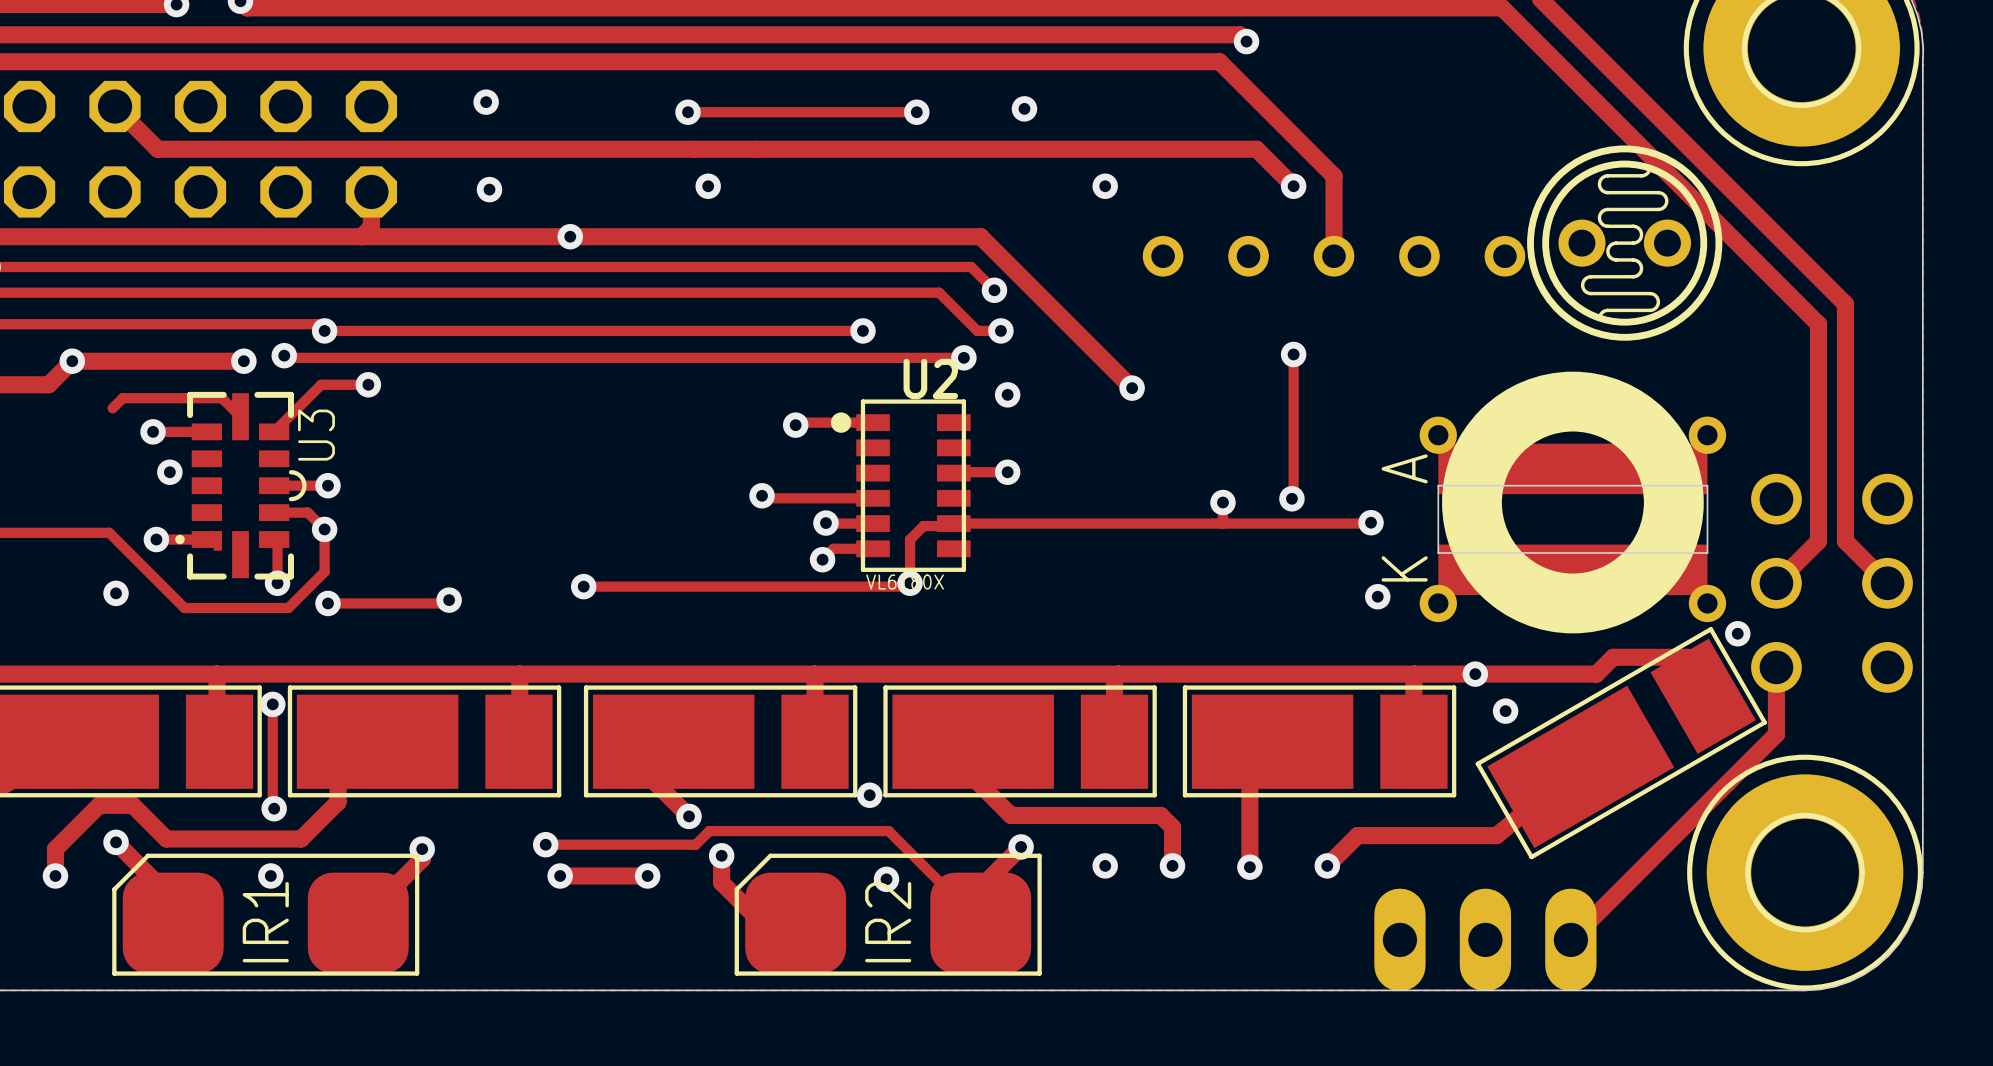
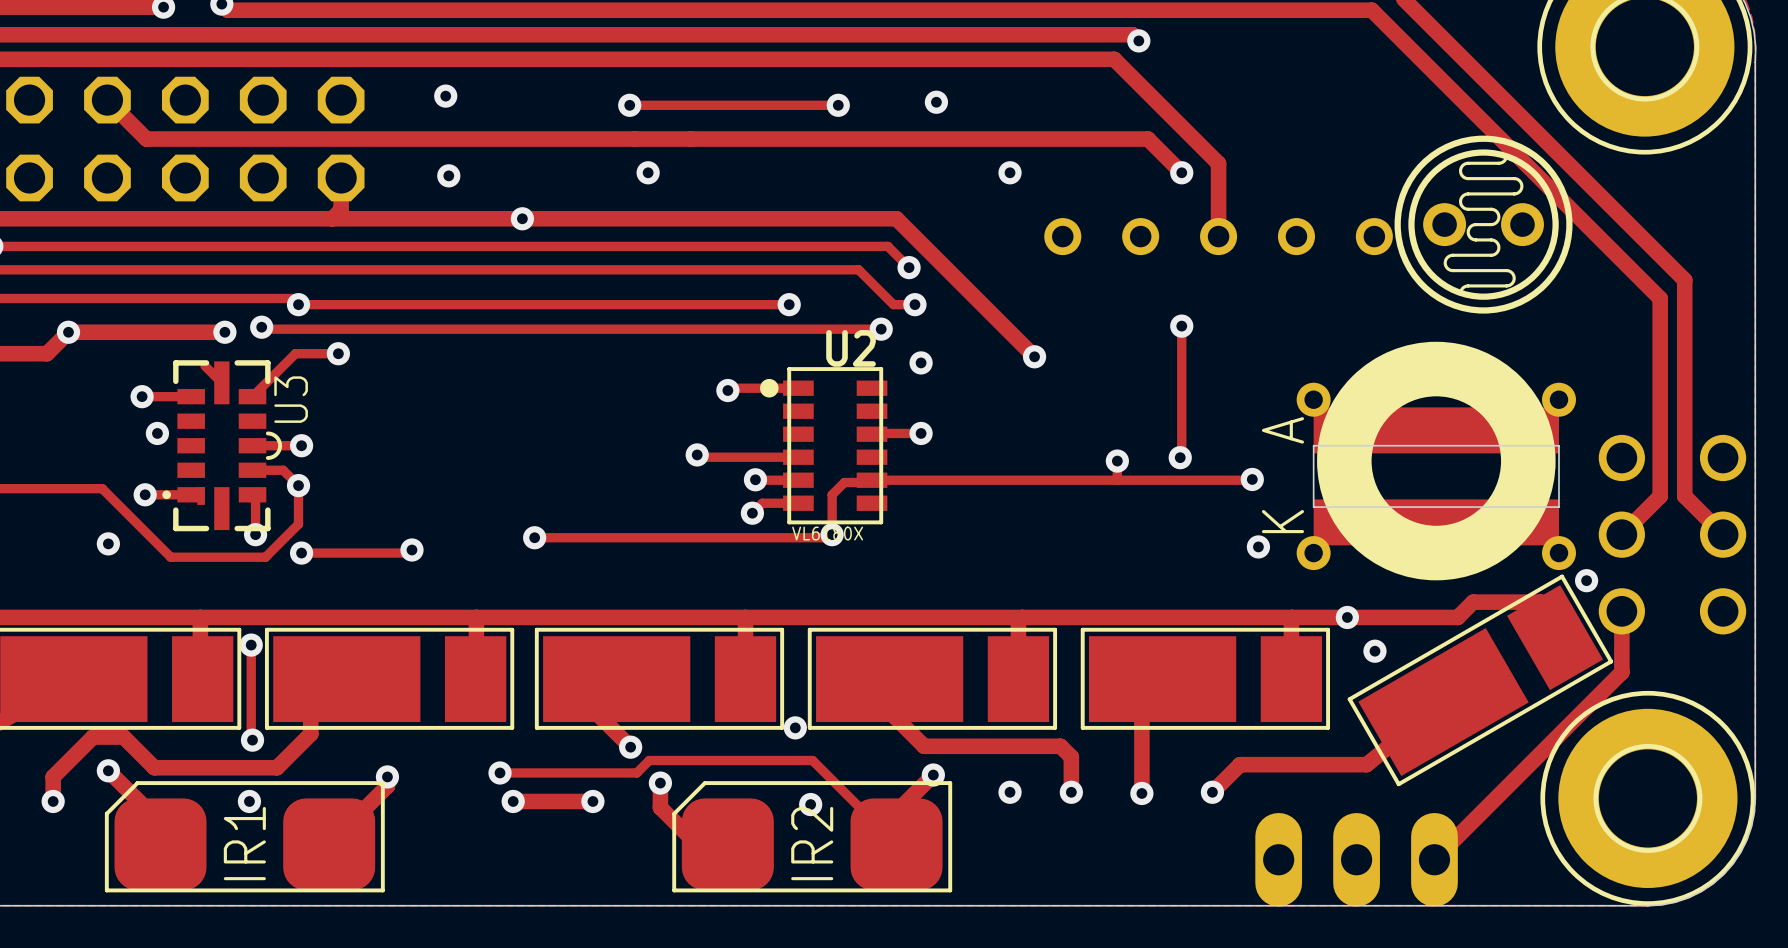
track: (222, 398) (122, 398) (112, 408) -> none

